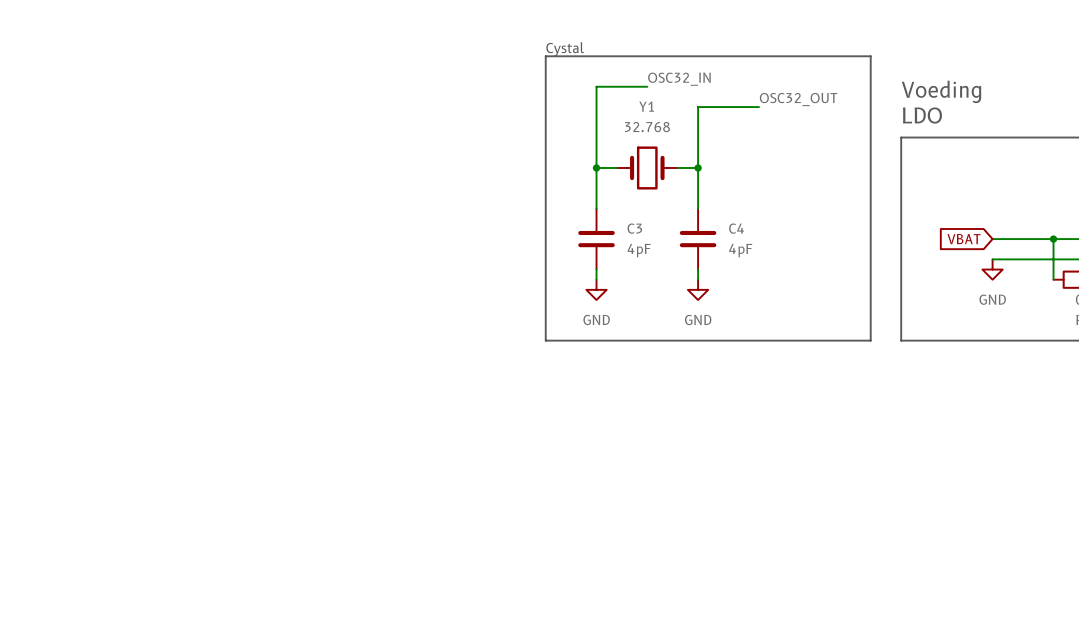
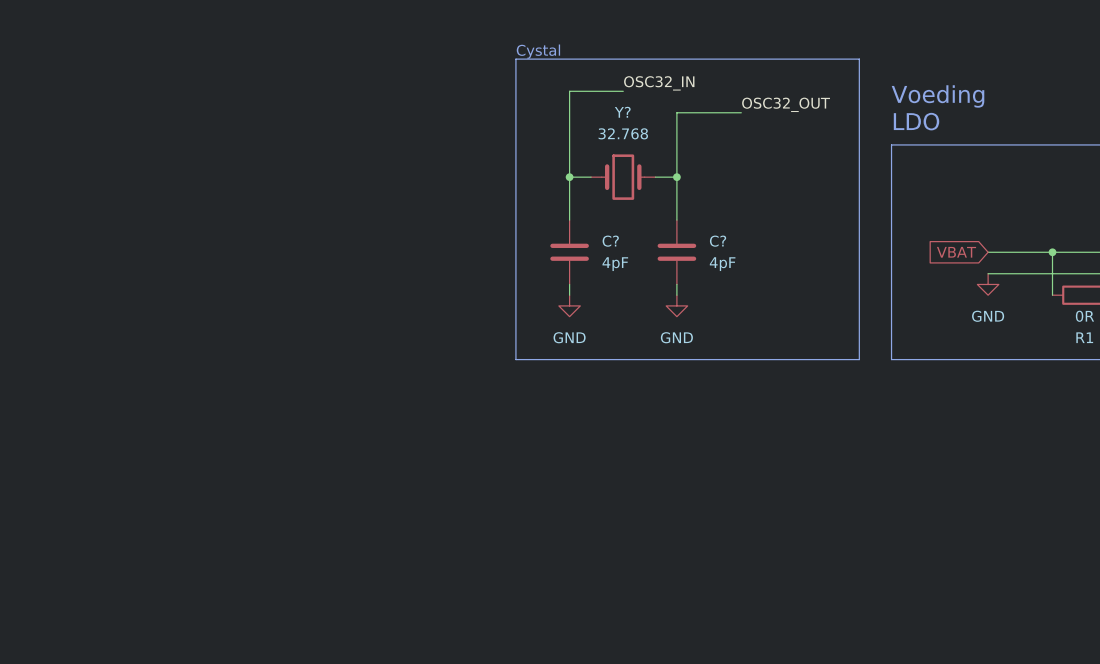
Y1 name: Y1 (646, 106) -> Y? (622, 112)
C3 name: C3 (634, 228) -> C? (610, 241)
C4 name: C4 (736, 228) -> C? (718, 241)

